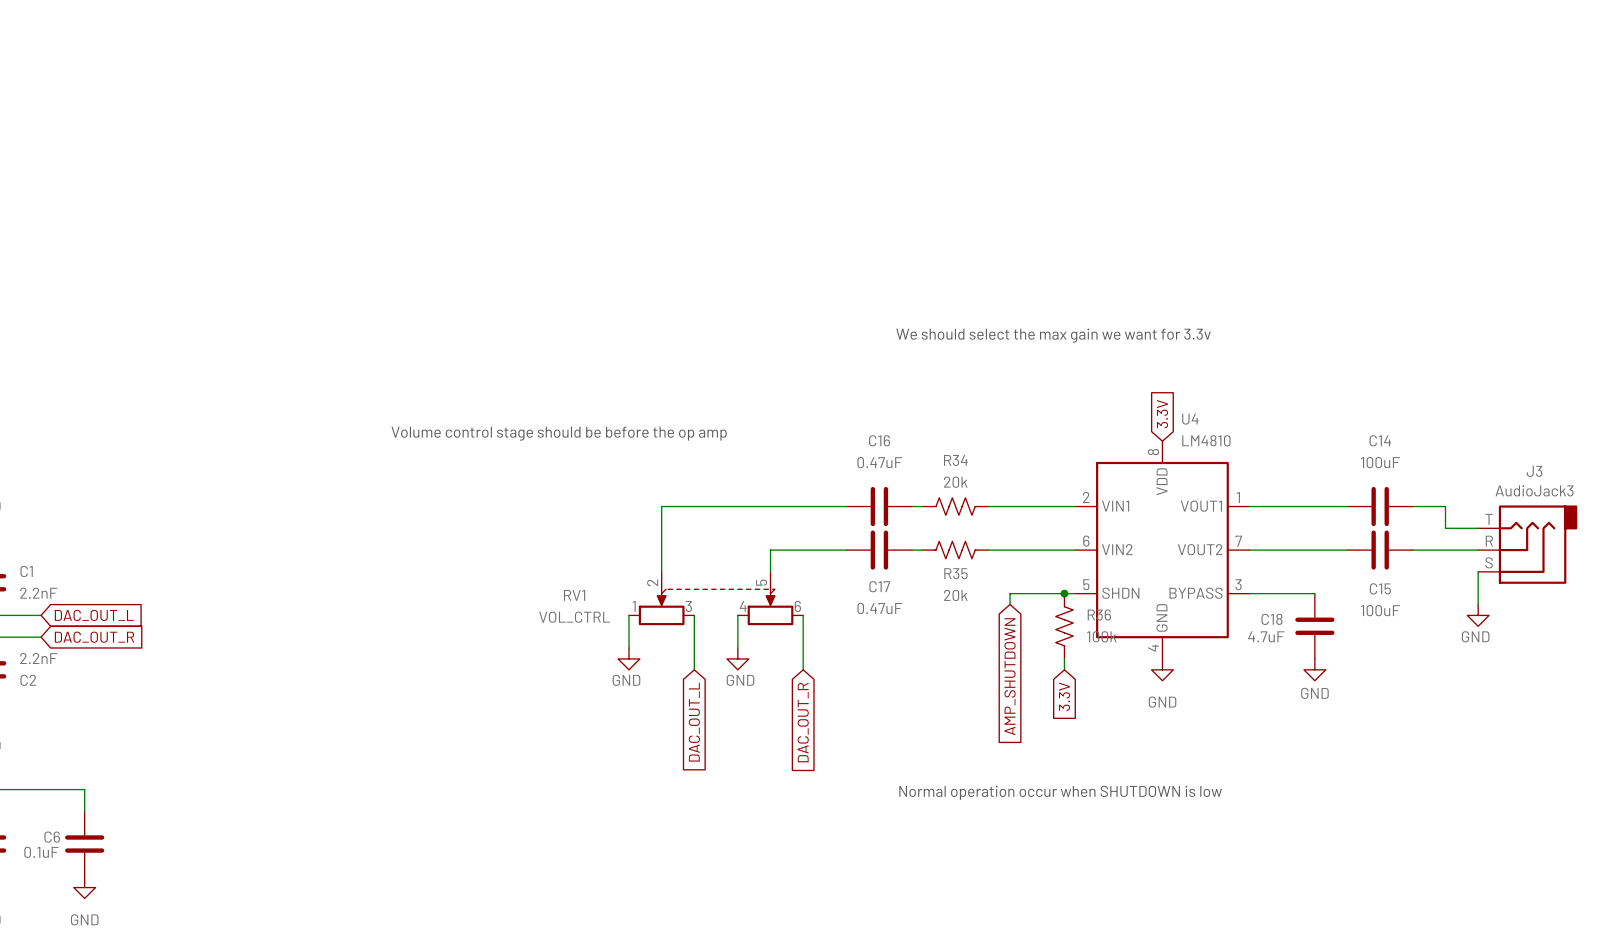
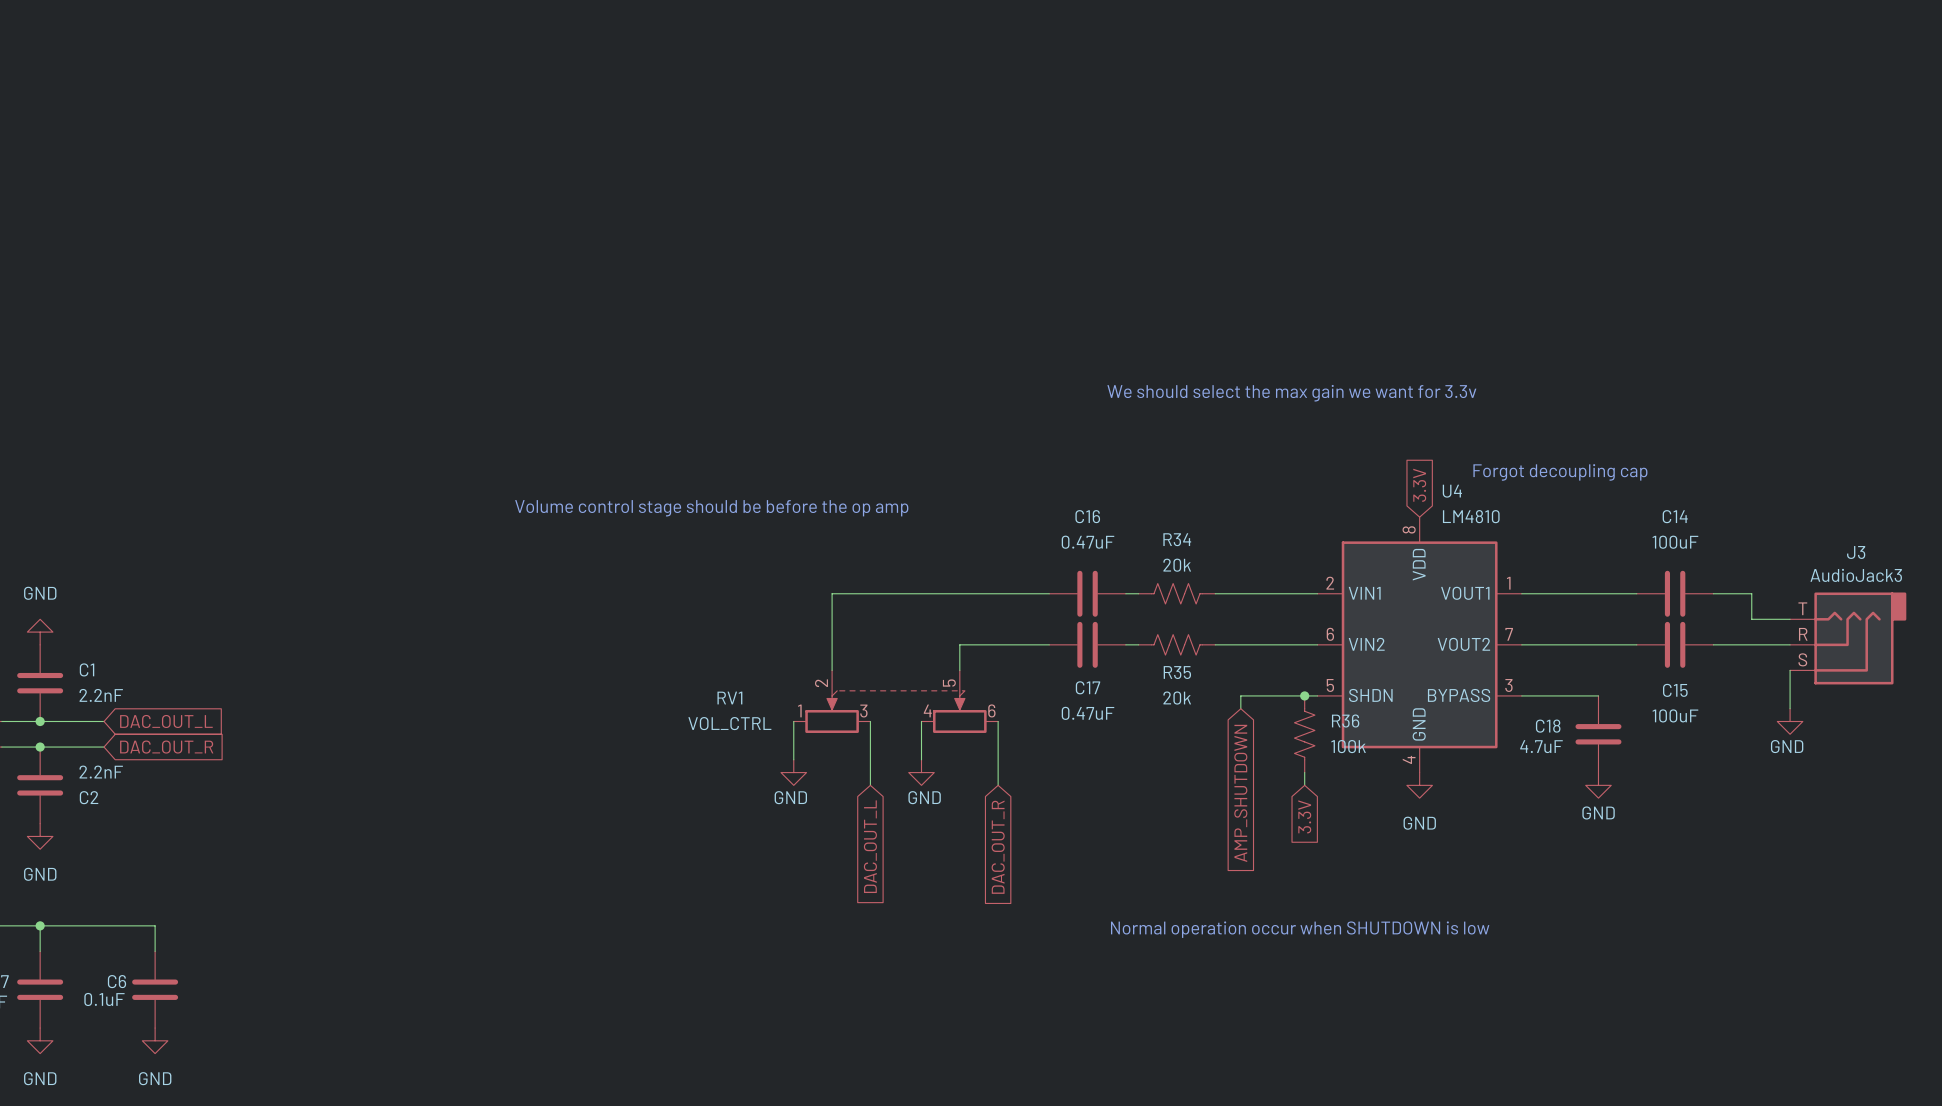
text: none -> Forgot decoupling cap (1560, 472)

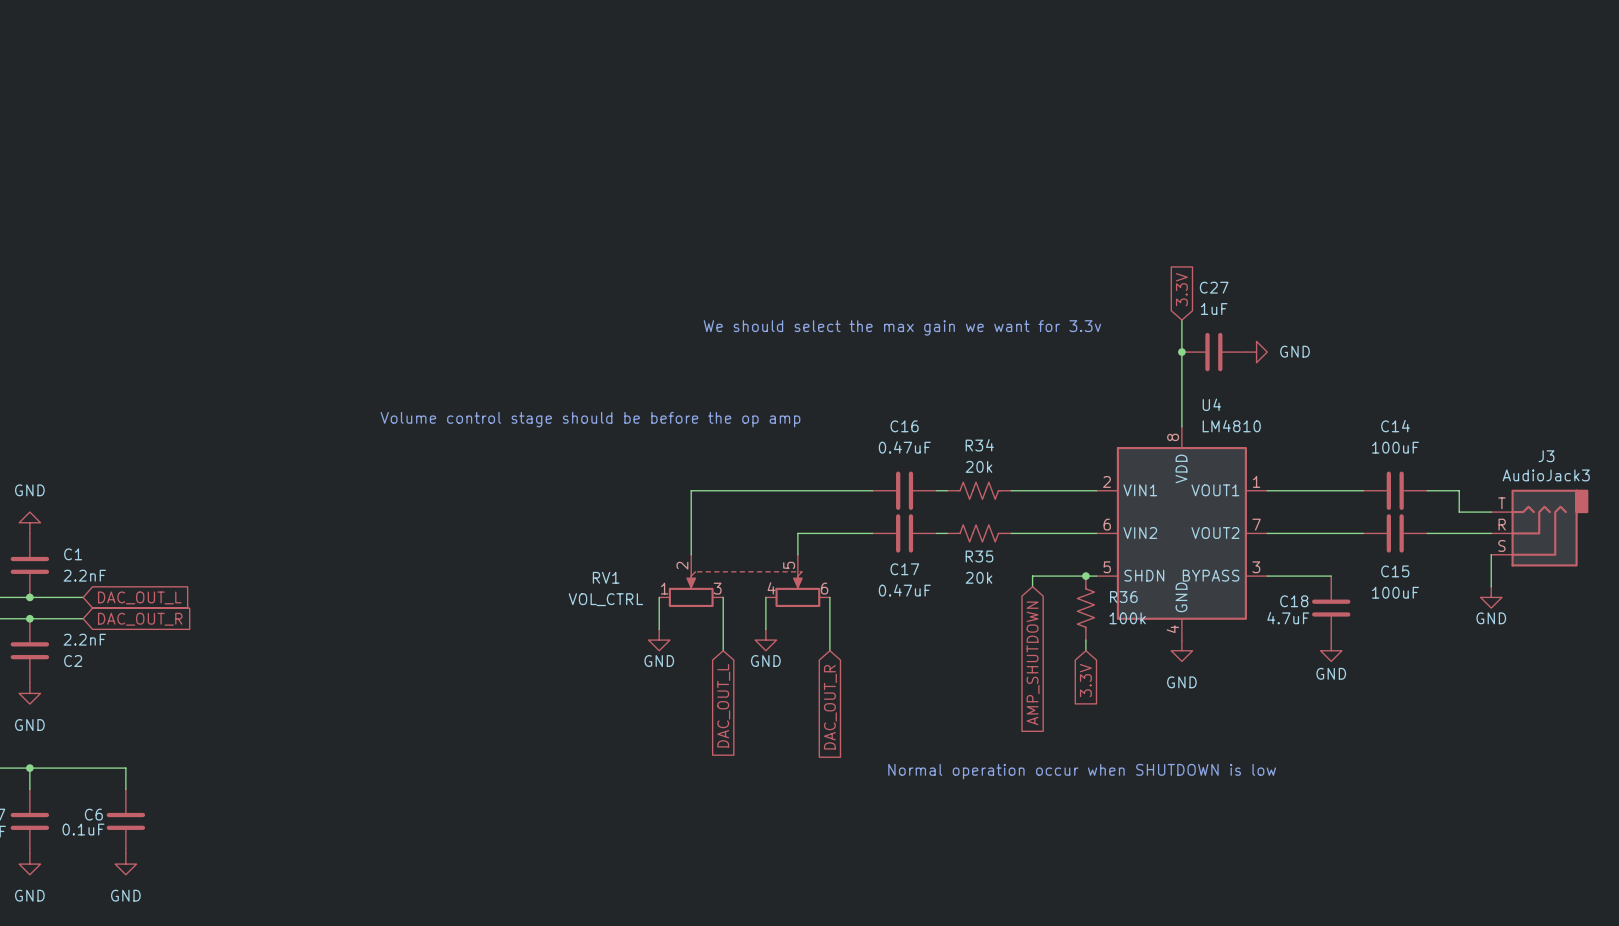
wire: none -> (1181, 320) (1181, 426)
text position: We should select the max gain we want for 3.3v (1291, 393) -> We should select the max gain we want for 3.3v (902, 327)
junction: none -> (1181, 352)
C27: none -> 1uF (1213, 352)
power symbol: none -> GND (1256, 352)
text: Forgot decoupling cap (1560, 472) -> none
global label position: 3.3V (1419, 485) -> 3.3V (1181, 289)

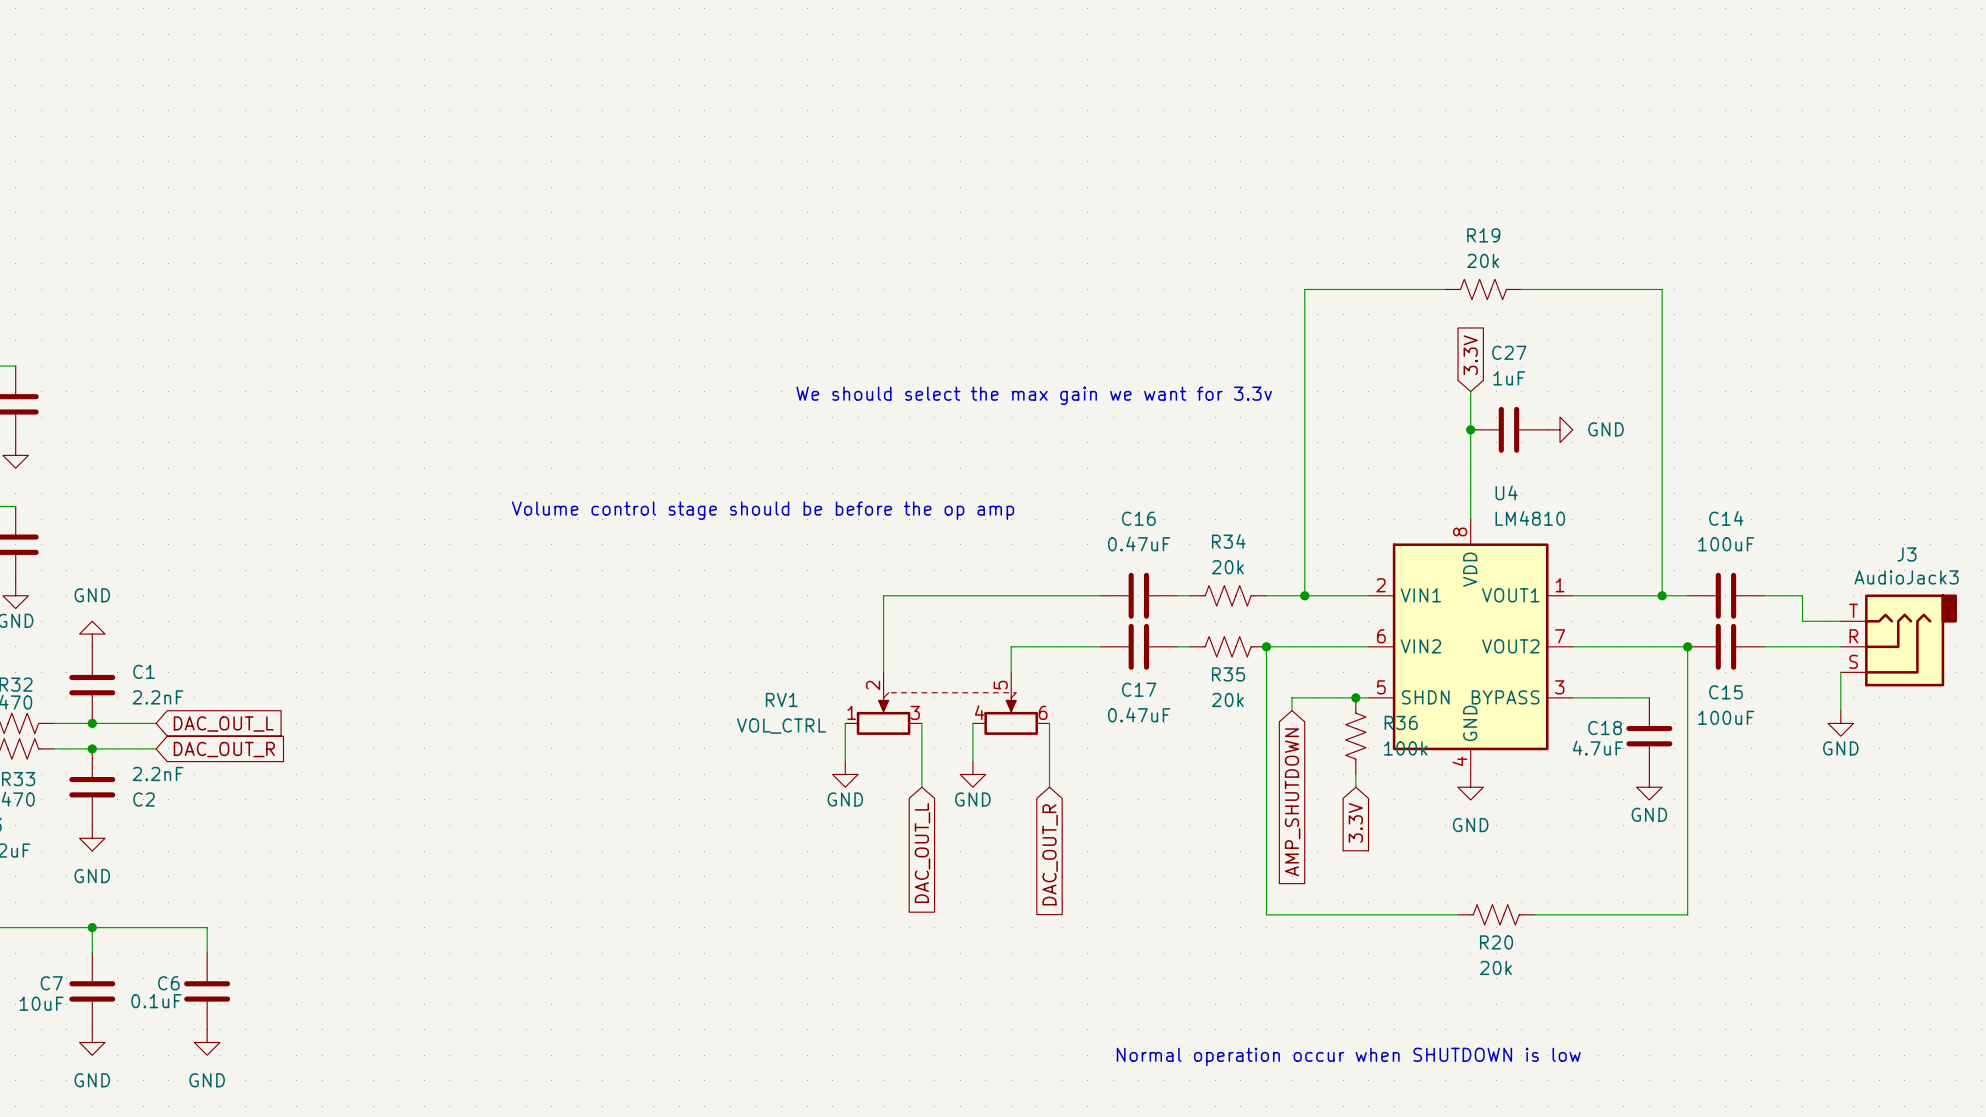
wire: none -> (1445, 289) (1304, 289) (1304, 595)
R19: none -> 20k (1483, 289)
wire: none -> (1521, 289) (1662, 289) (1662, 595)
text position: We should select the max gain we want for 3.3v (902, 327) -> We should select the max gain we want for 3.3v (1034, 395)
junction: none -> (1304, 595)
junction: none -> (1662, 595)
wire: none -> (1266, 646) (1266, 914) (1457, 914)
junction: none -> (1266, 646)
wire: none -> (1687, 646) (1687, 914) (1534, 914)
junction: none -> (1687, 646)
R20: none -> 20k (1496, 914)
text position: Normal operation occur when SHUTDOWN is low (1082, 771) -> Normal operation occur when SHUTDOWN is low (1348, 1056)

